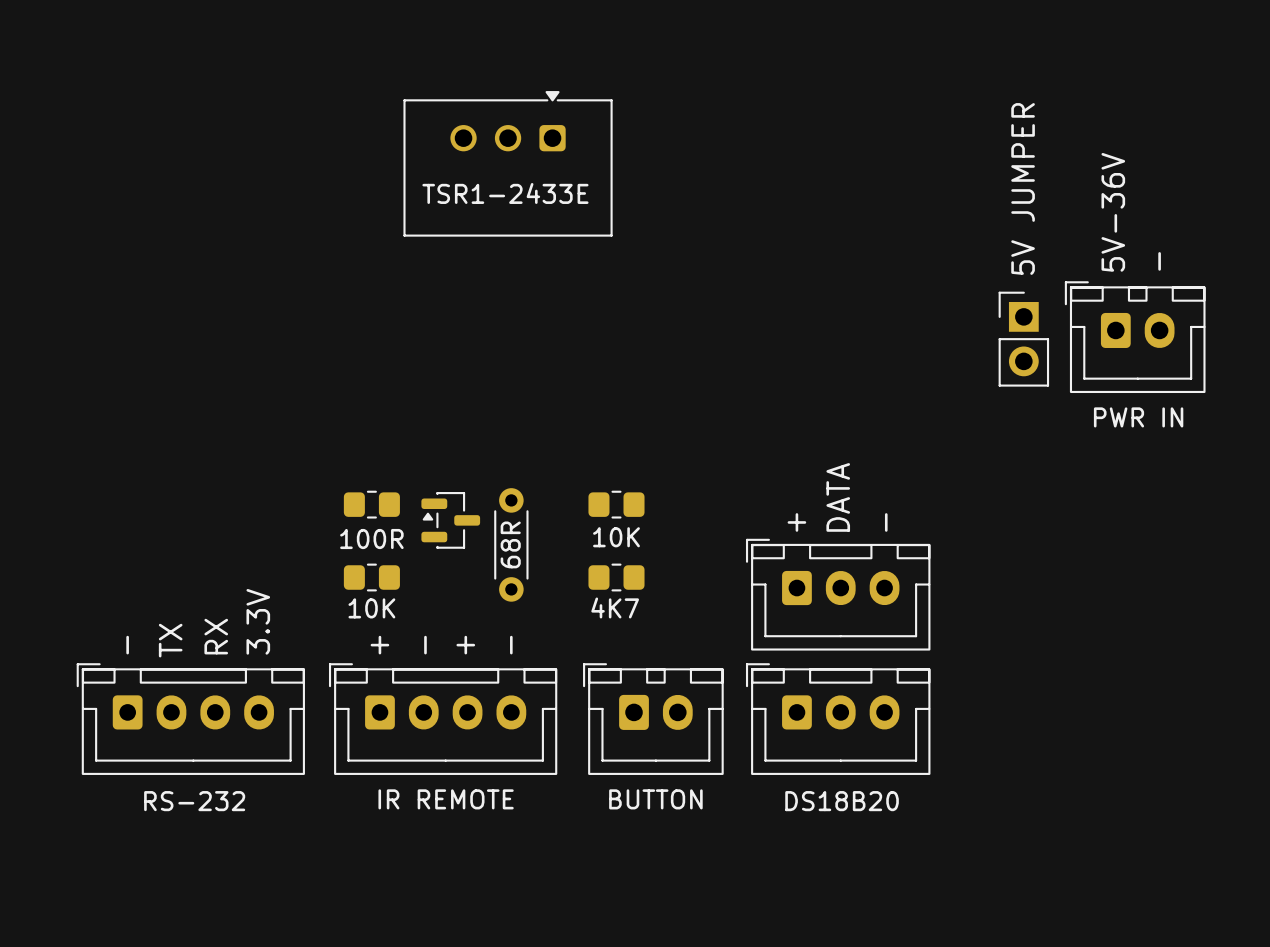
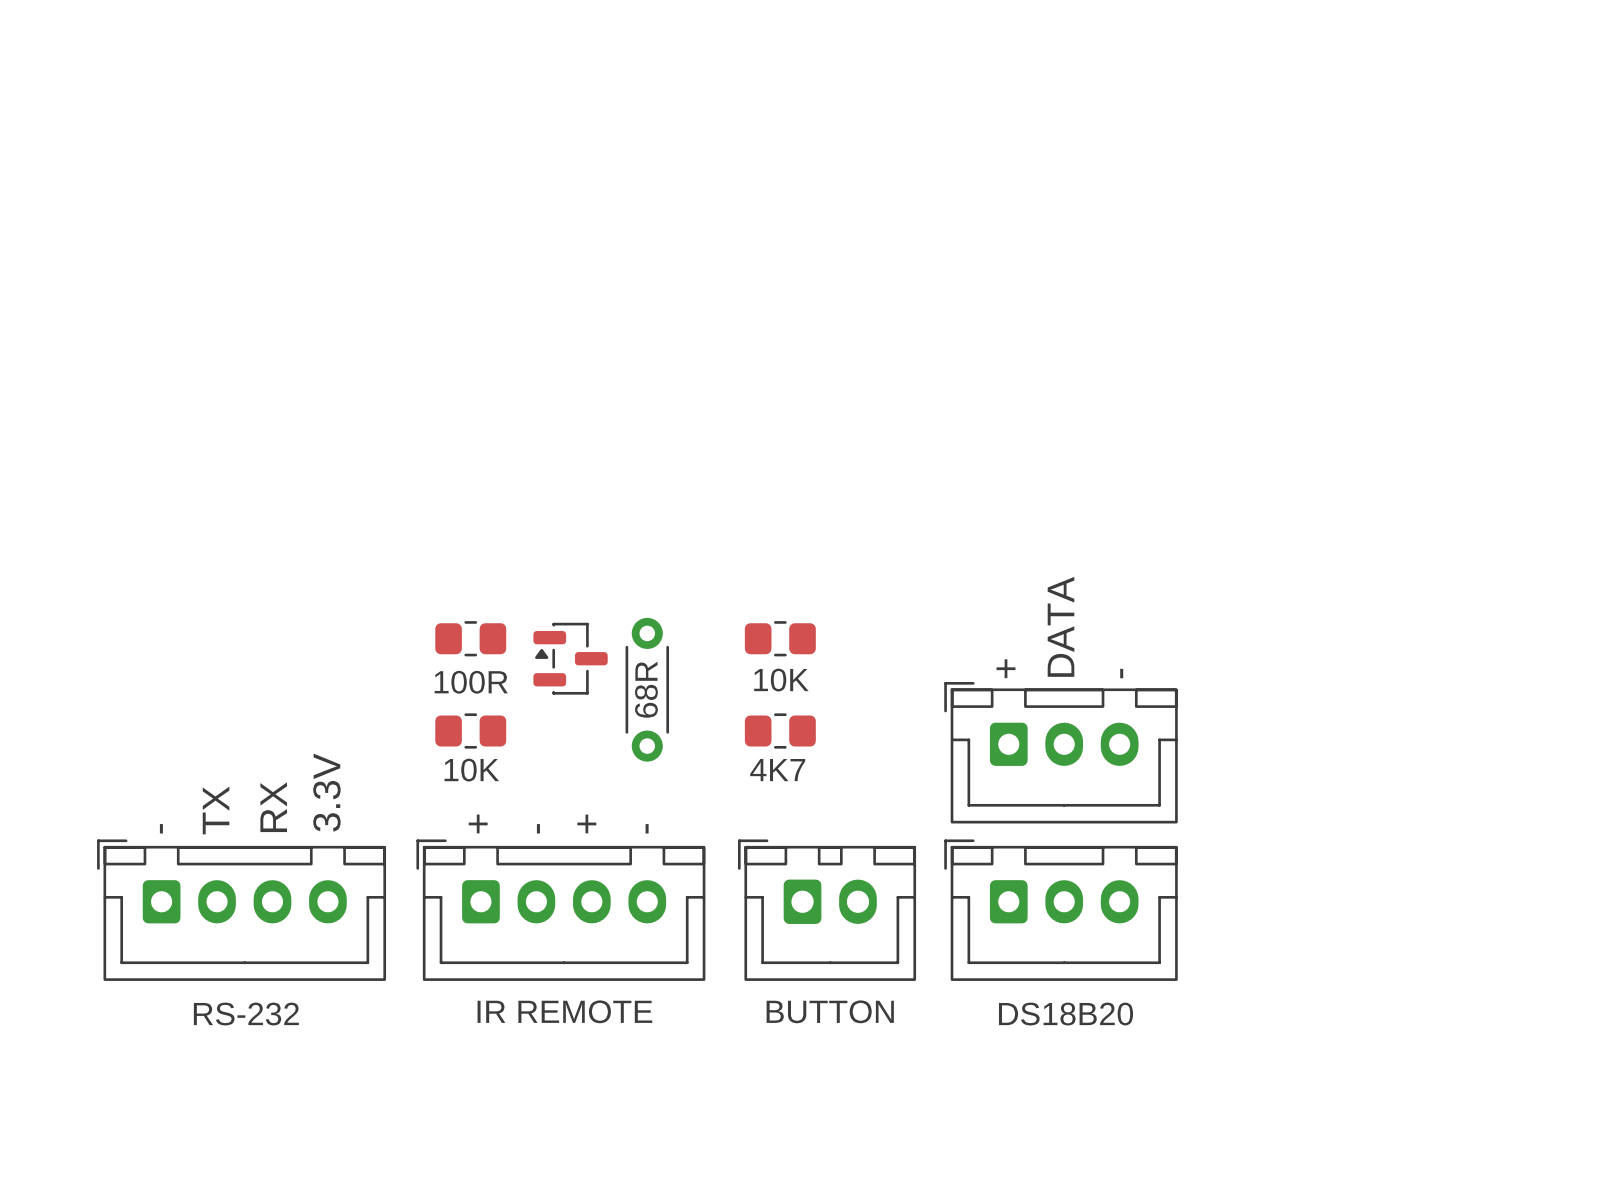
part: TSR1-2433E (508, 163) -> none
text: 5V JUMPER (1023, 188) -> none
text: 5V-36V (1113, 212) -> none
text: - (1159, 261) -> none
part: PWR IN (1135, 337) -> none
part: (1023, 339) -> none

